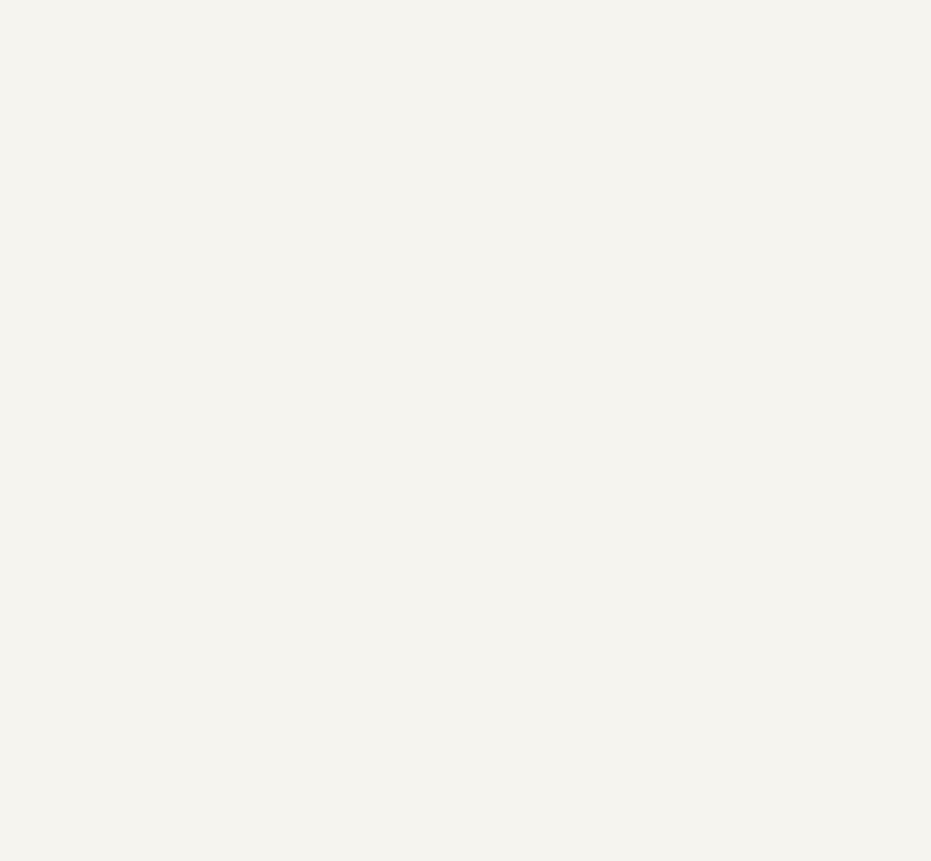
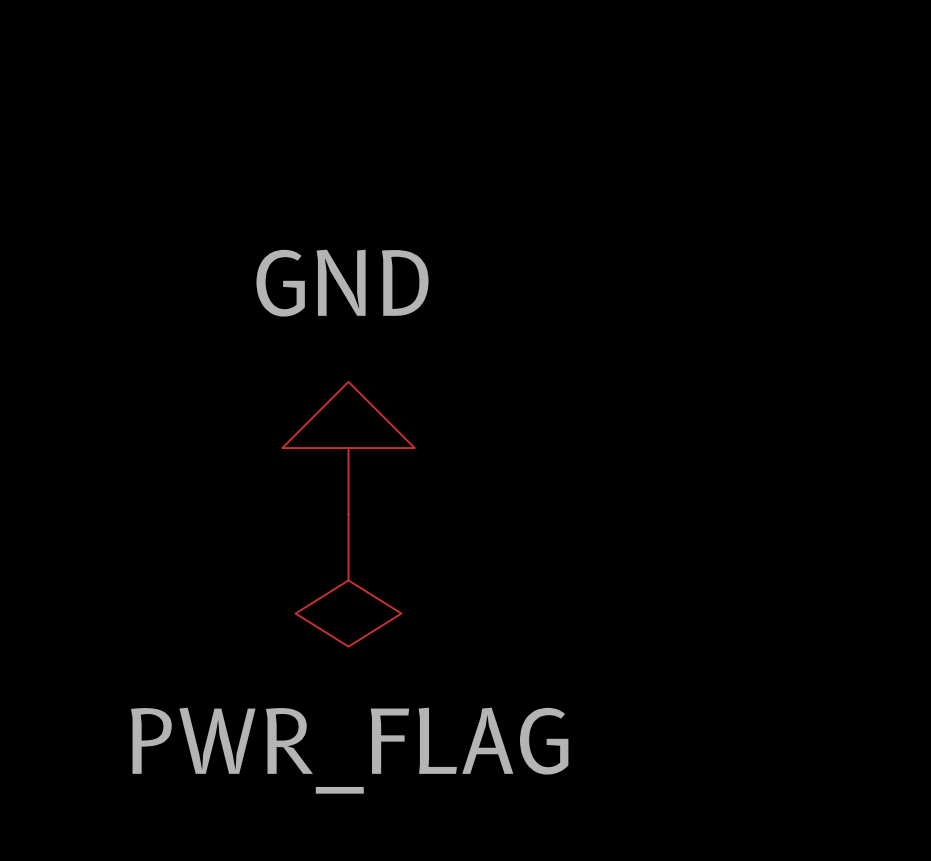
power symbol: none -> GND (348, 448)
power symbol: none -> PWR_FLAG (348, 580)

